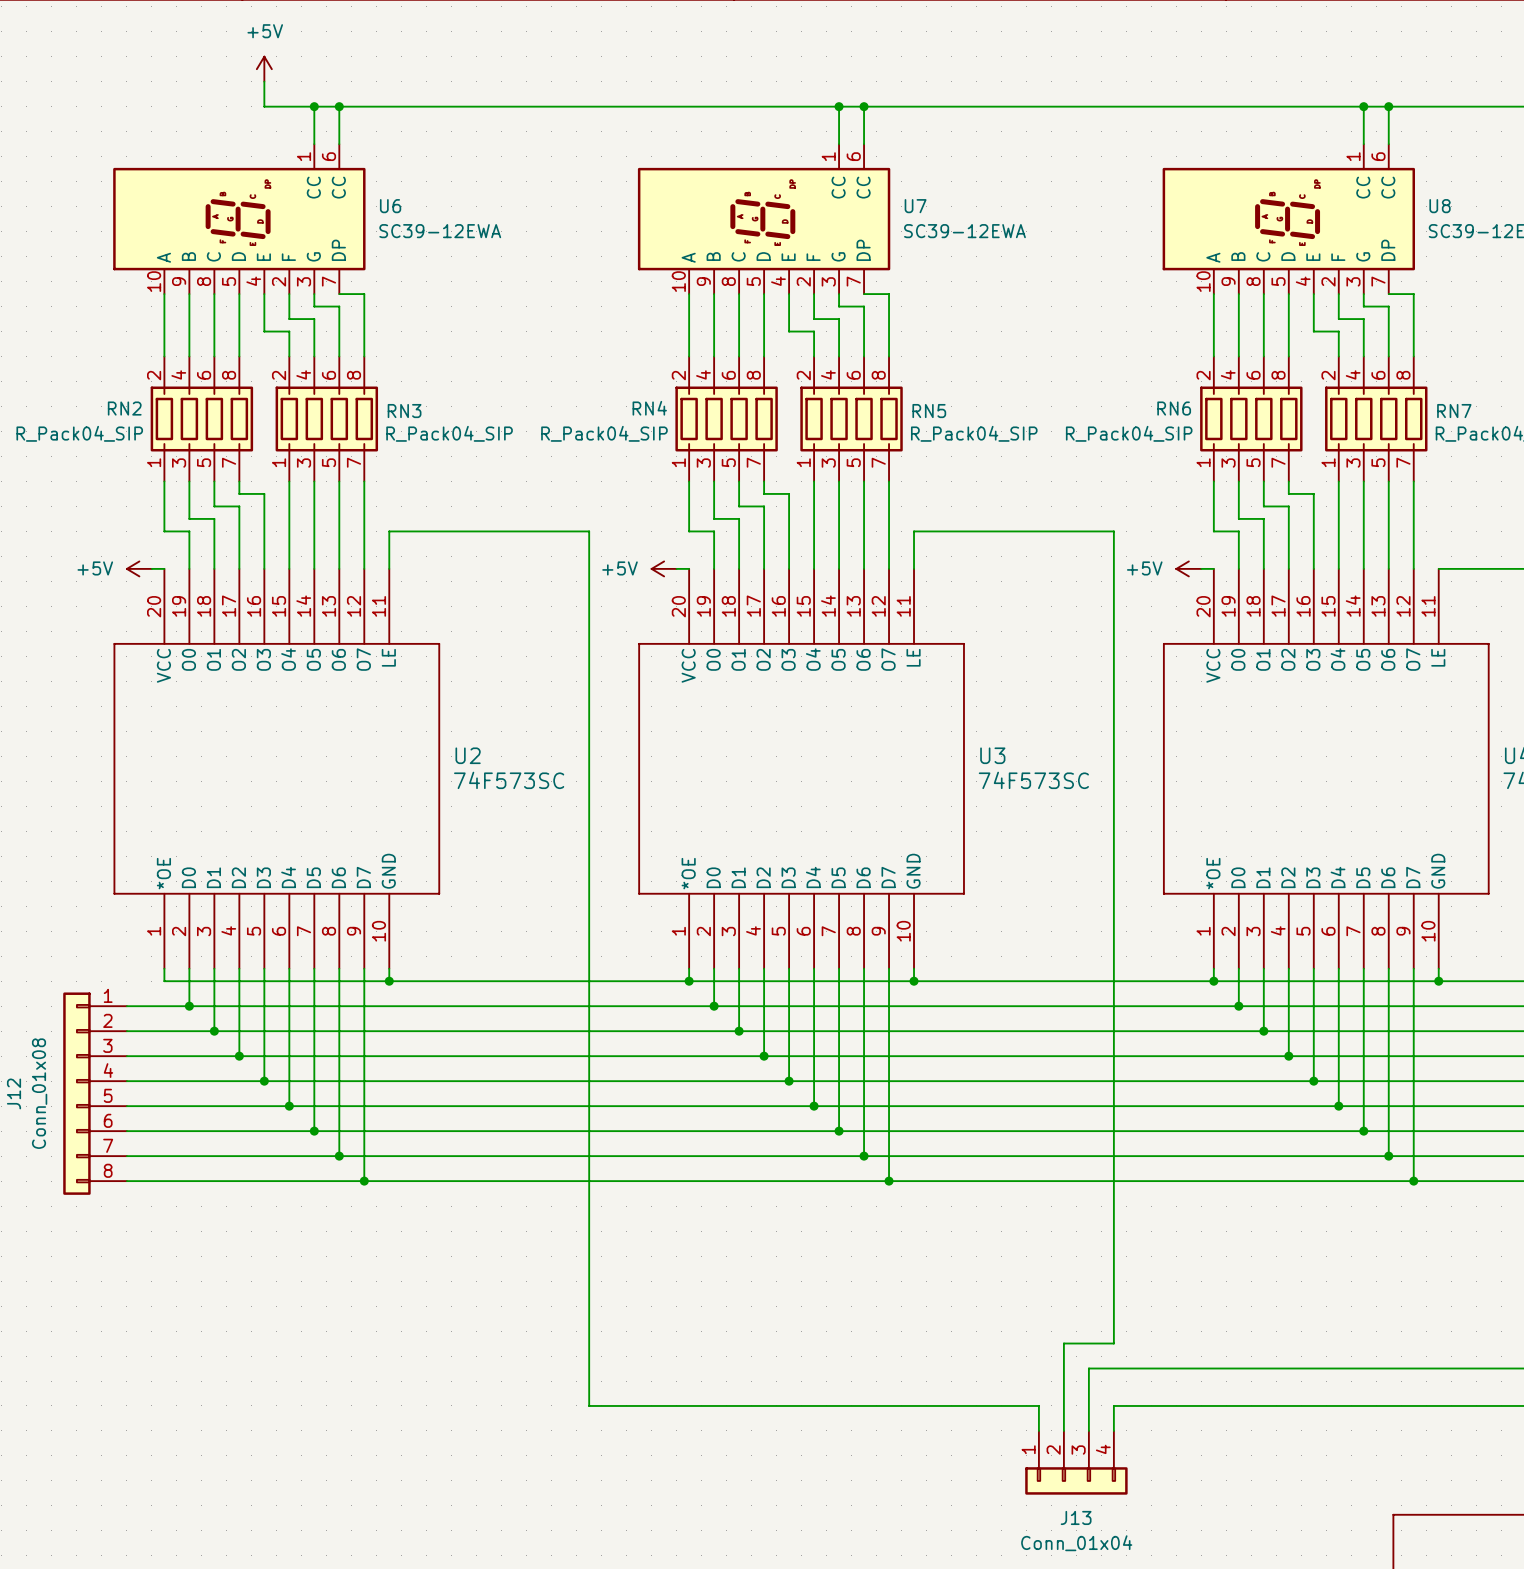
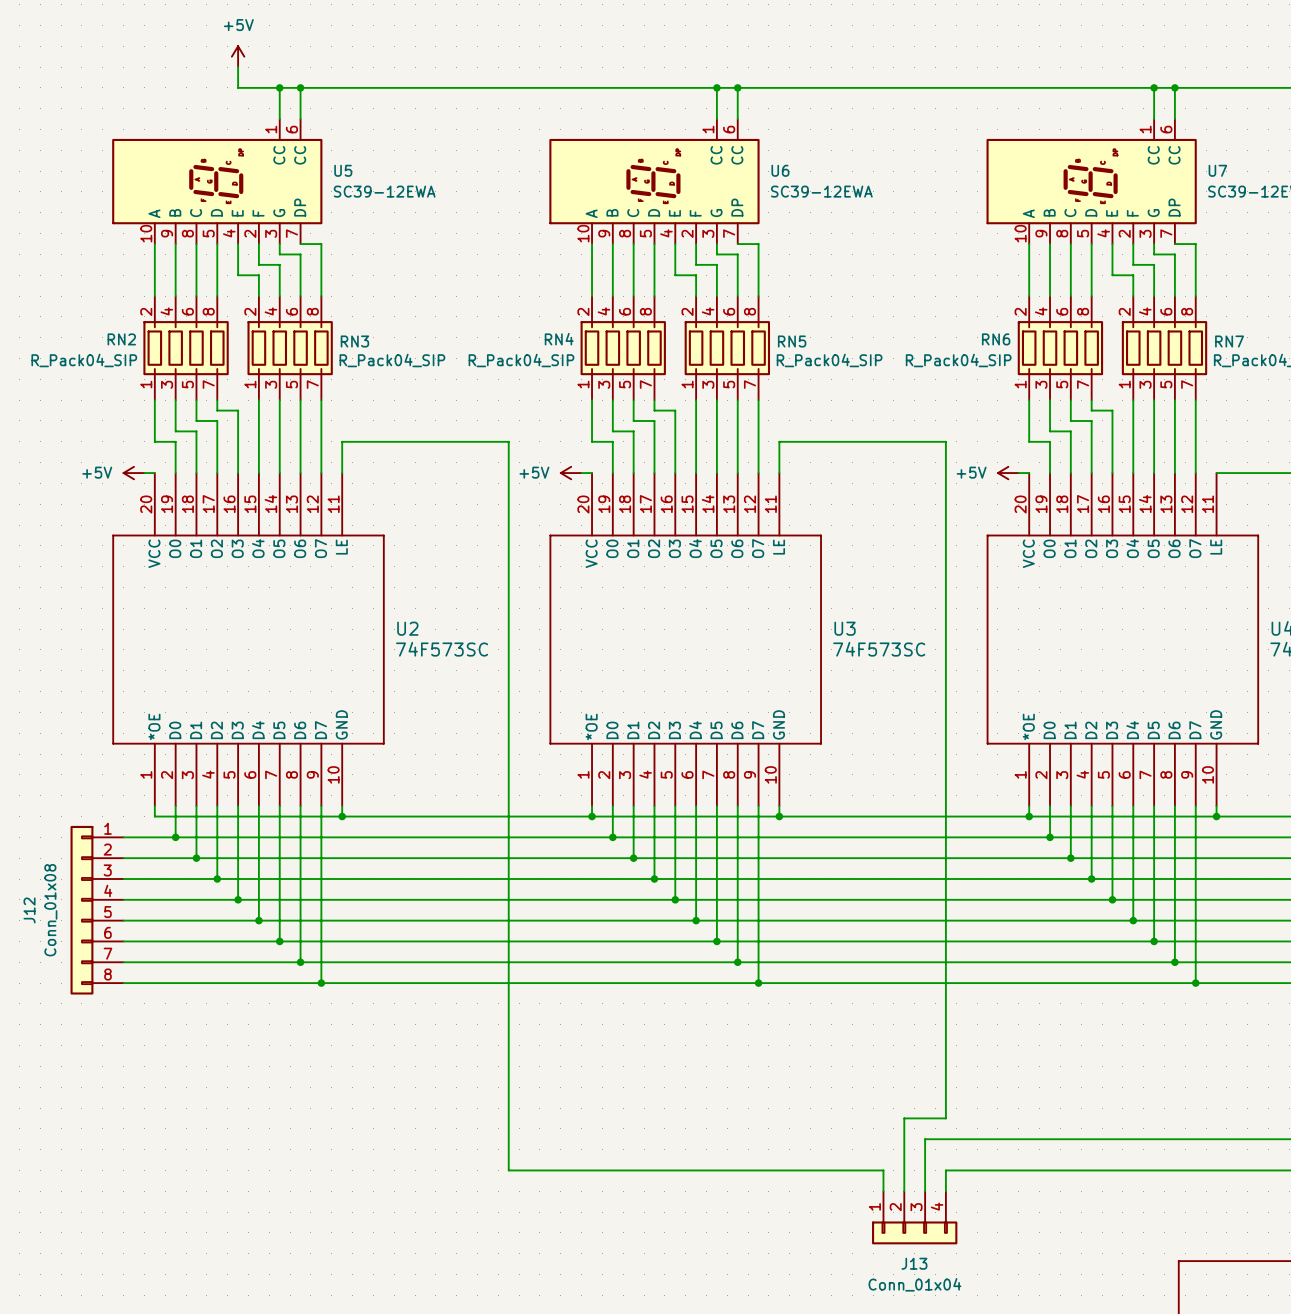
U6 name: U6 (390, 206) -> U5 (343, 170)
U7 name: U7 (915, 206) -> U6 (780, 170)
U8 name: U8 (1440, 206) -> U7 (1217, 170)

